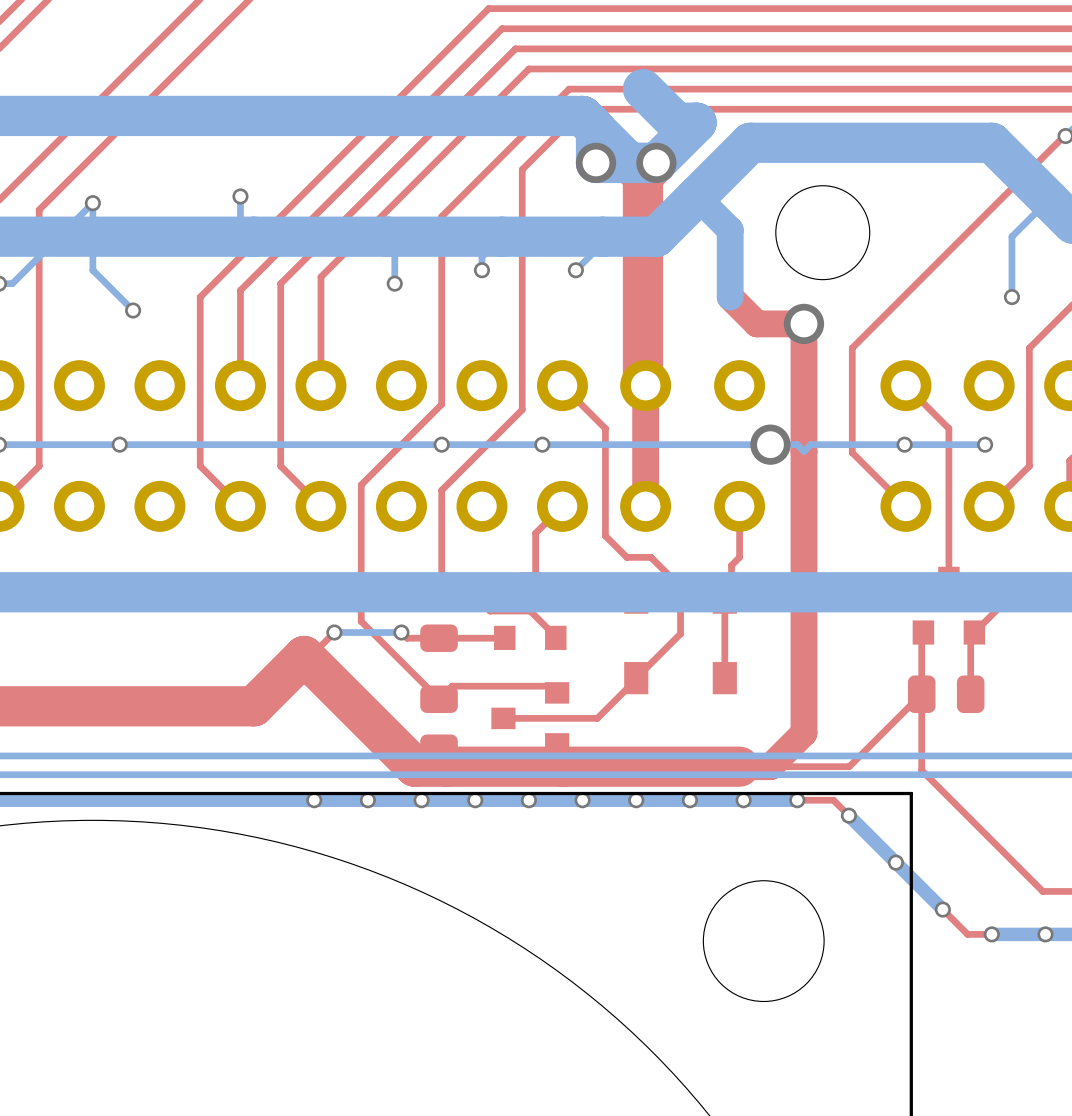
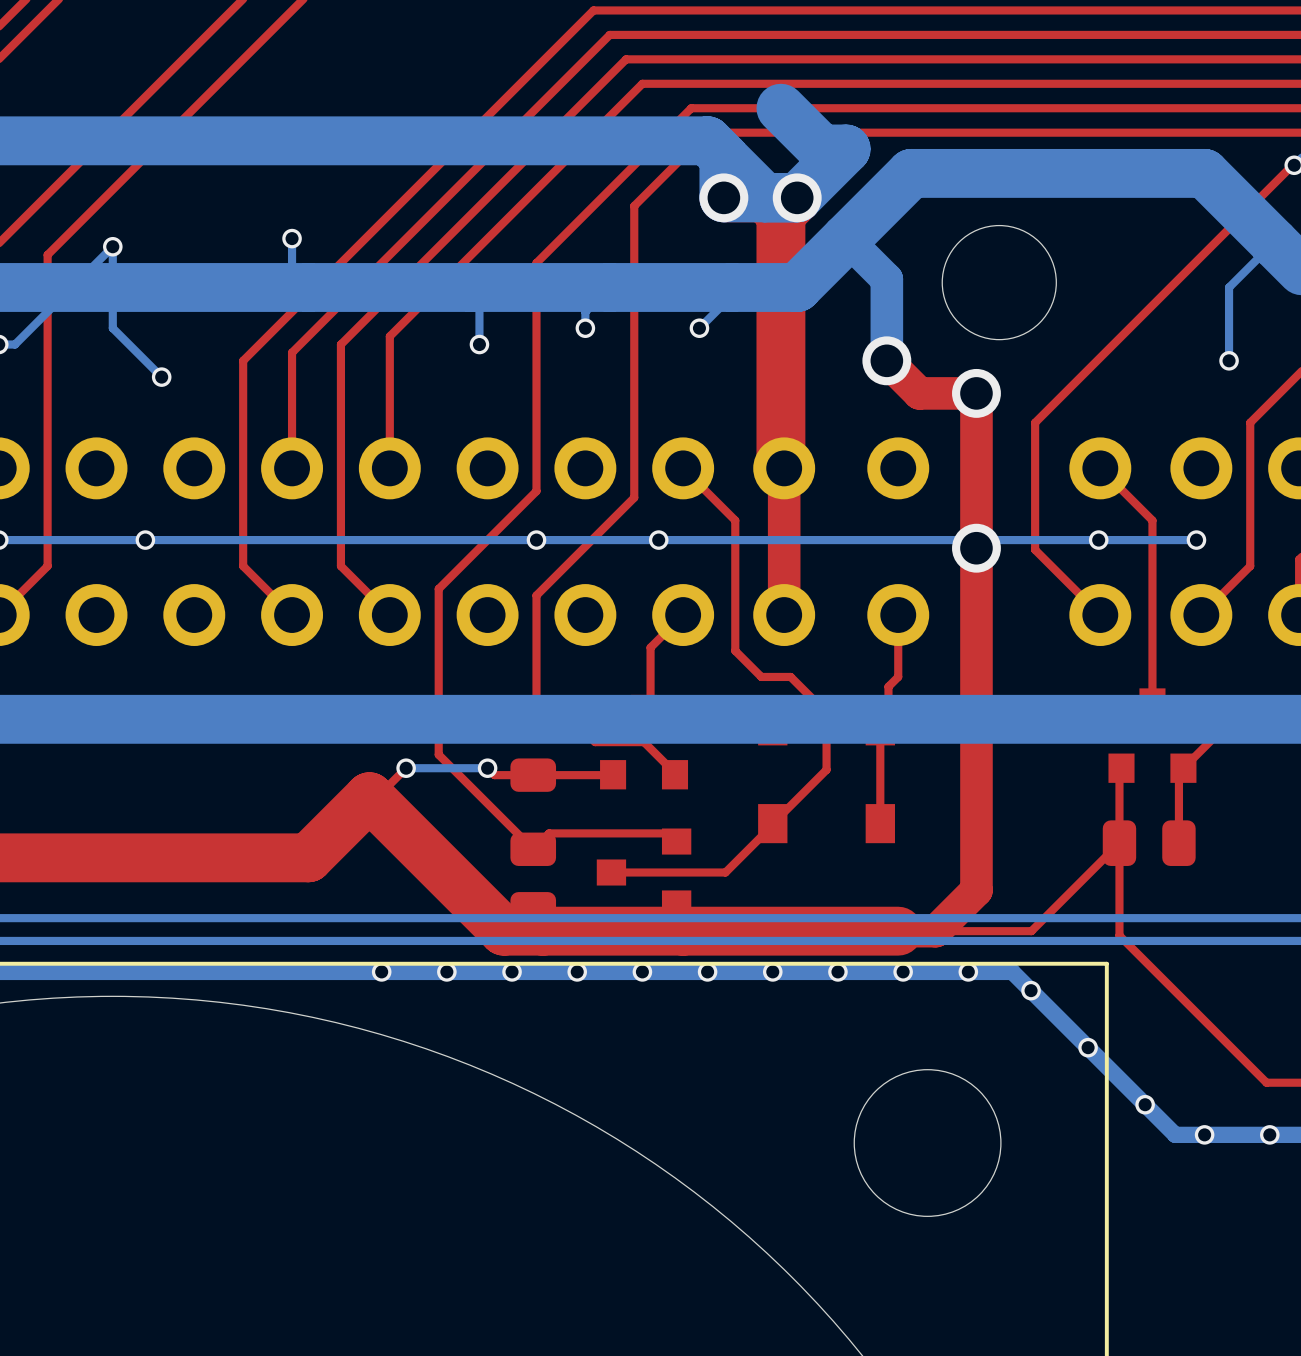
via: none -> (886, 360)
via position: (770, 444) -> (976, 548)
bottom track: none -> (968, 971) (1012, 971) (1031, 990)
top track: (797, 800) (833, 800) (848, 815) -> none
bottom track: none -> (1145, 1104) (1175, 1134) (1204, 1134)
top track: (942, 909) (967, 934) (991, 934) -> none

